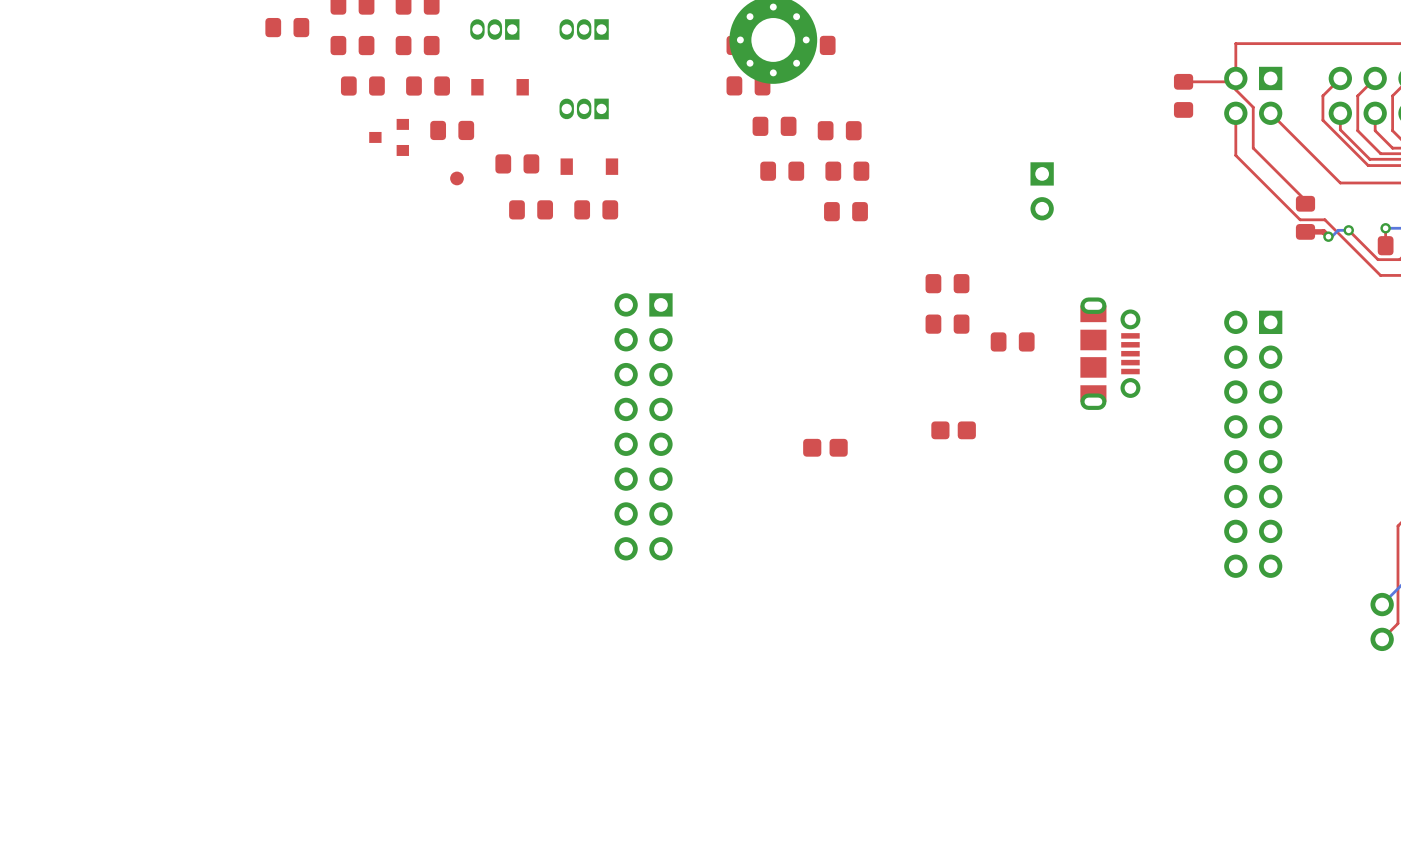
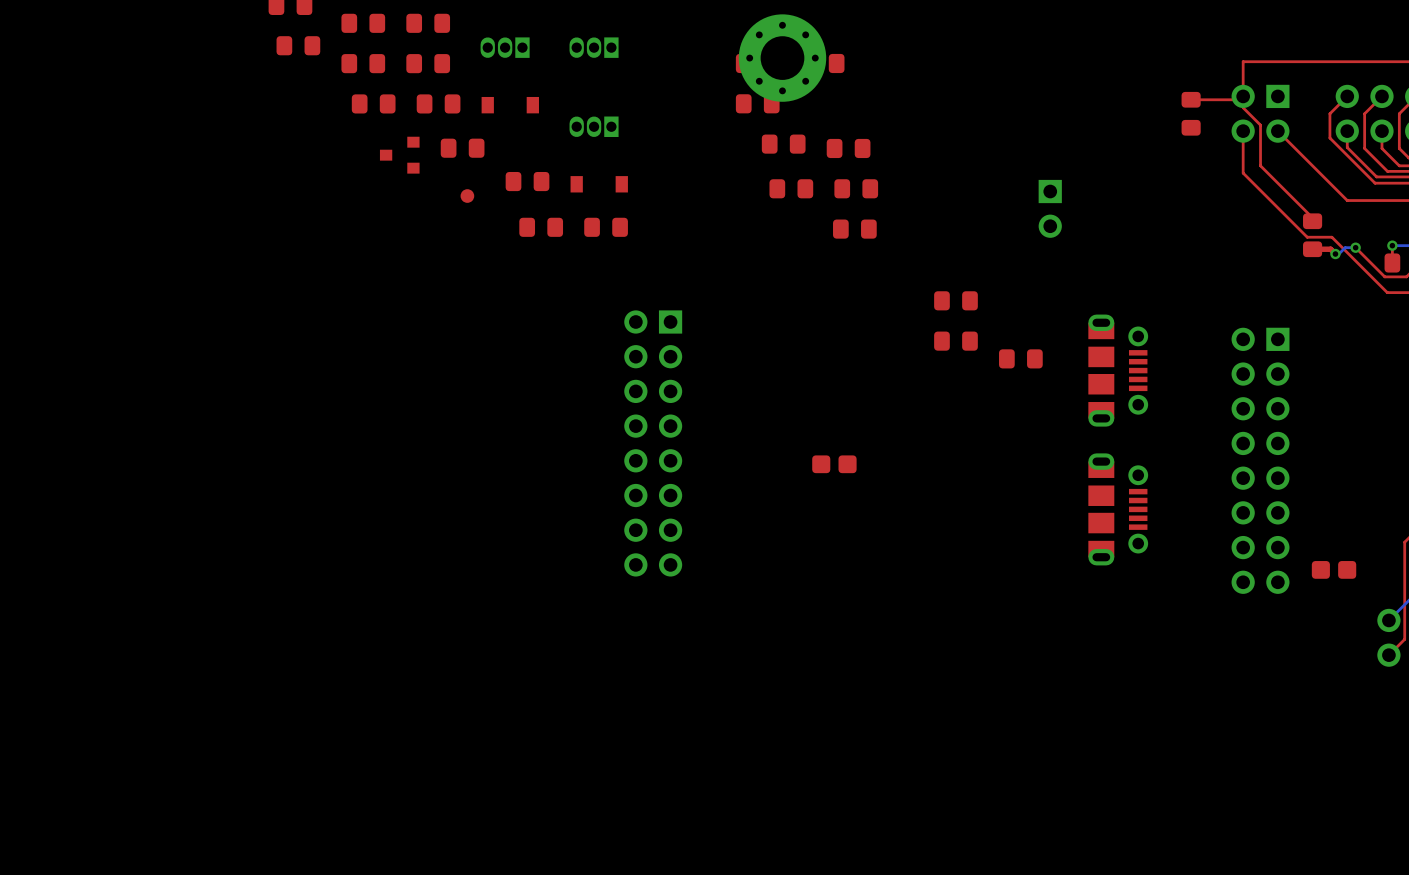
part: (953, 430) -> none
part: none -> (1118, 509)
part: none -> (1334, 569)

